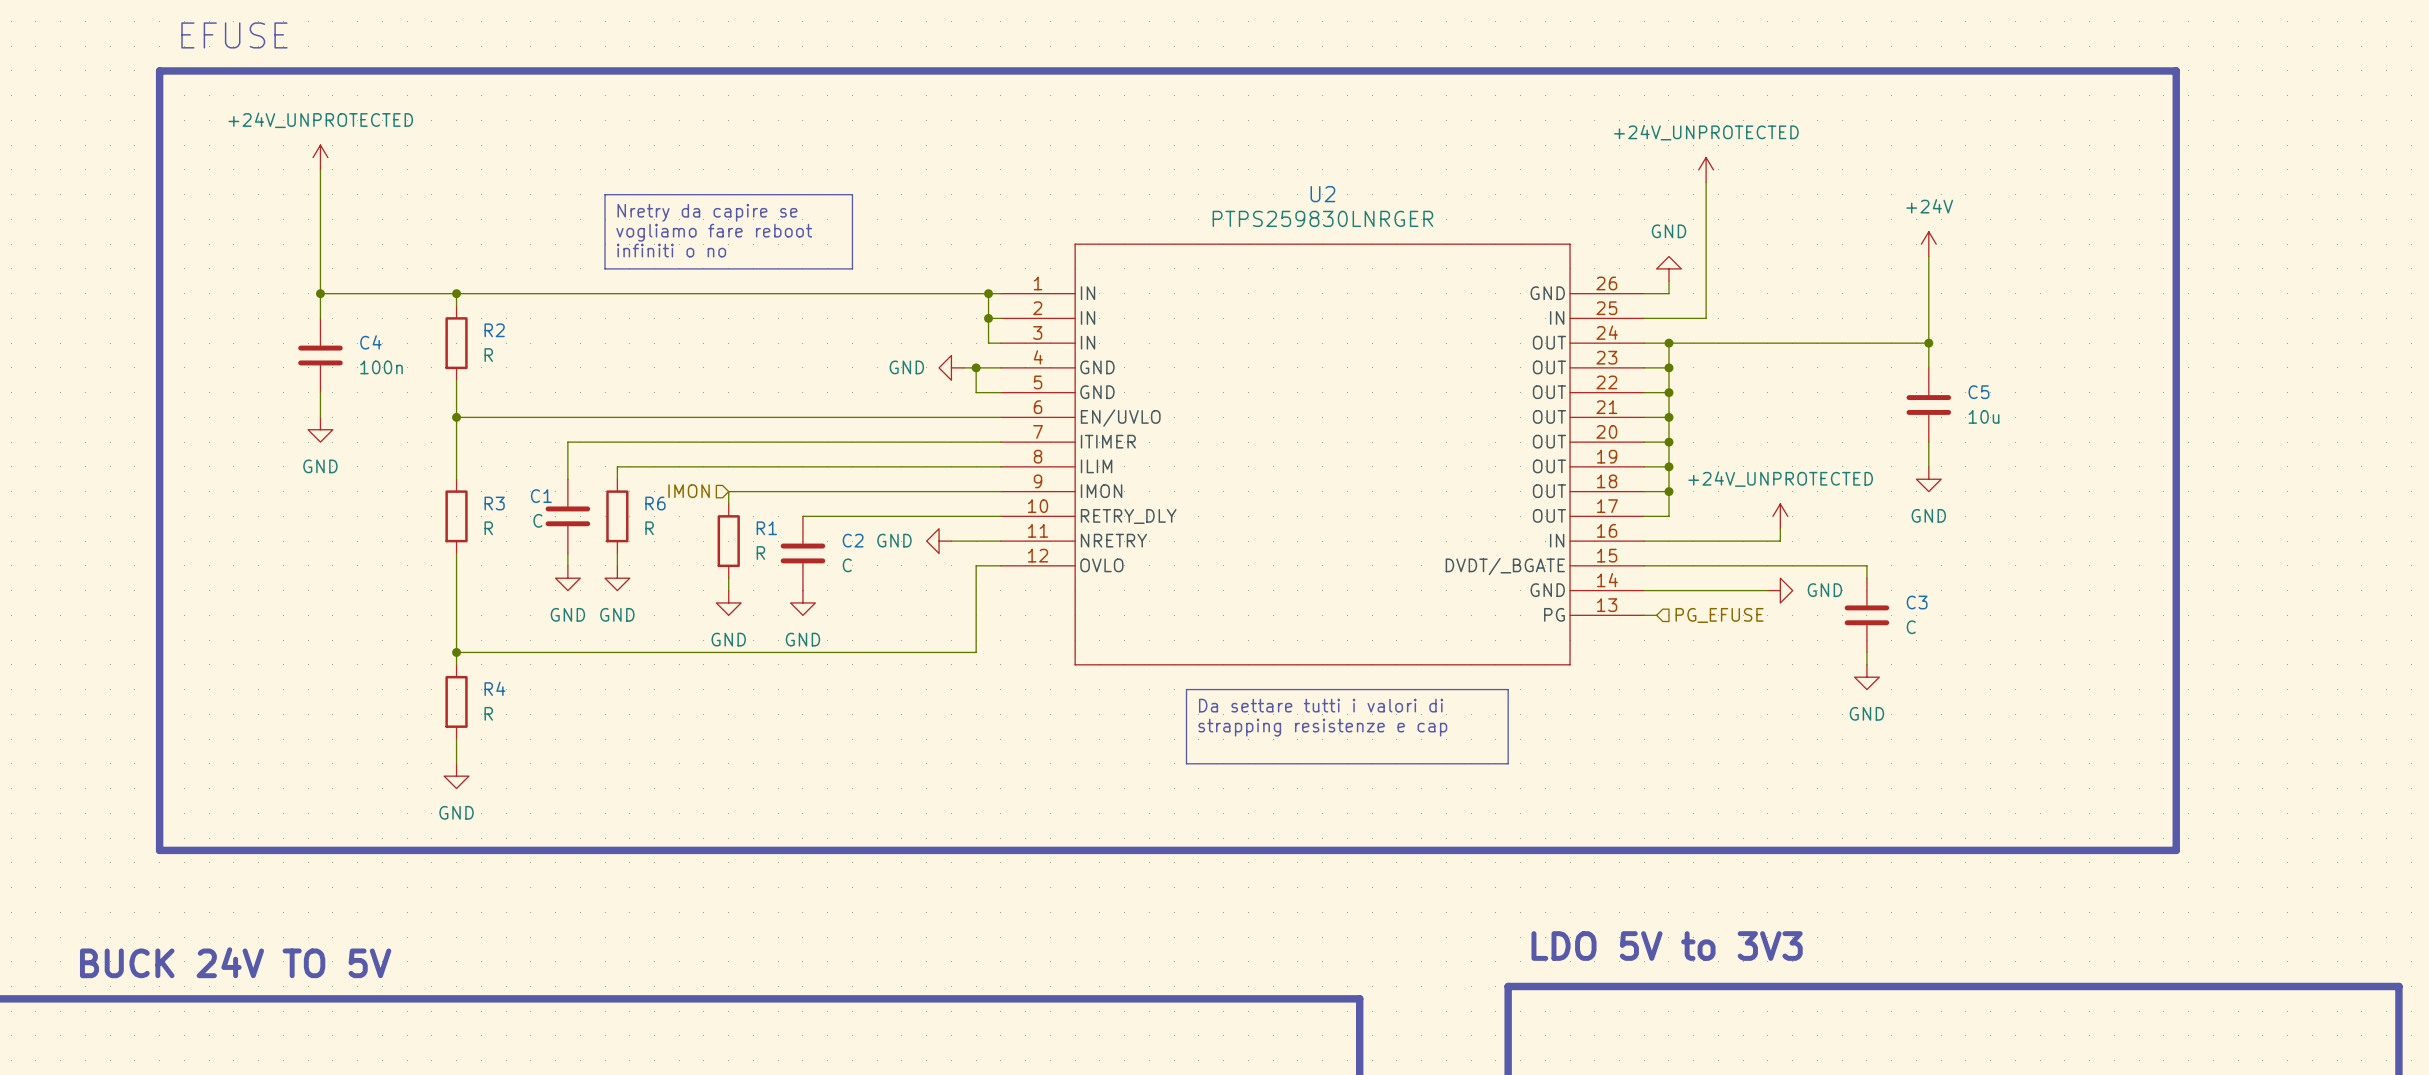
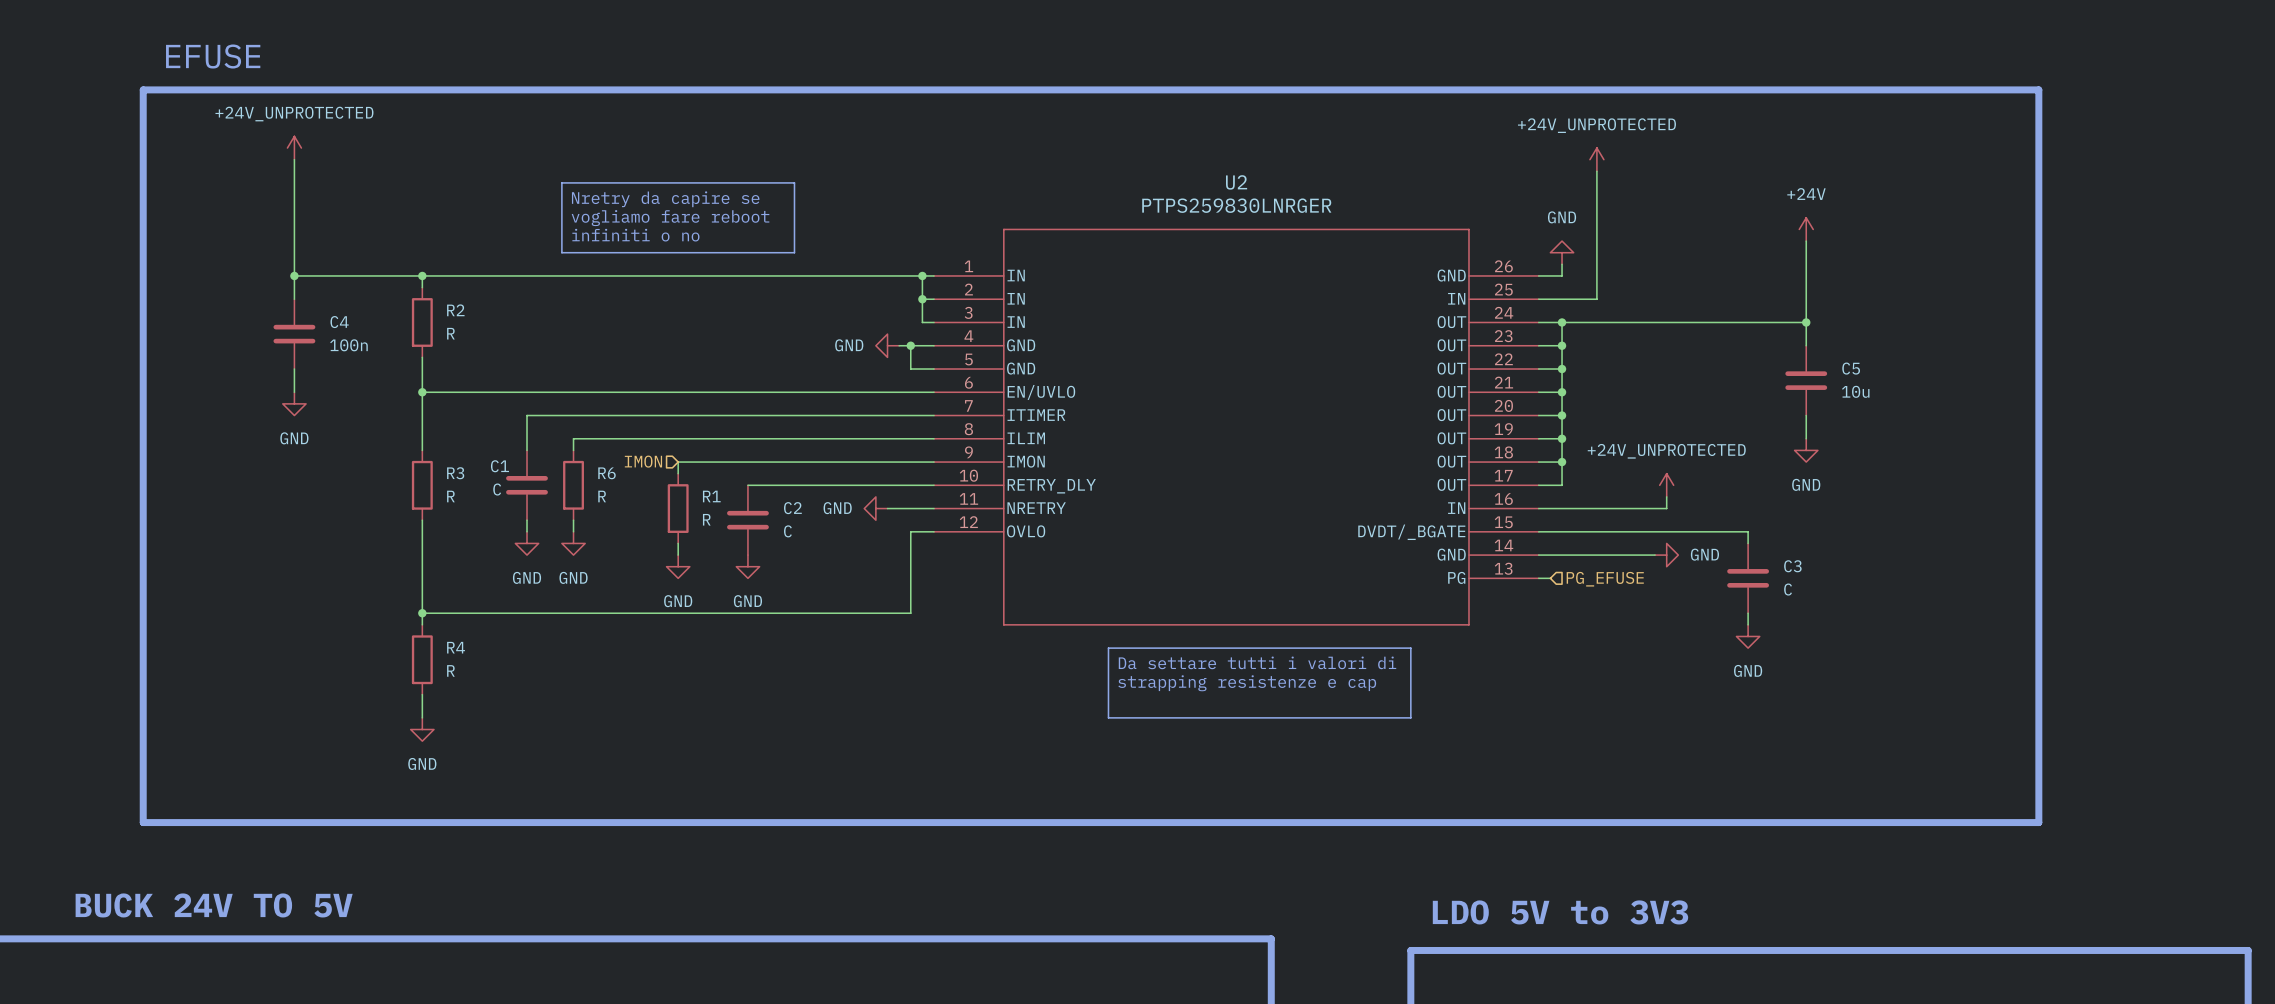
text position: EFUSE (234, 35) -> EFUSE (213, 56)
line: (159, 95) (159, 70) (2176, 70) (2176, 95) -> (143, 89) (2038, 89)
line: (159, 850) (2176, 850) -> (143, 799) (143, 822) (2038, 822) (2038, 799)
text position: LDO 5V to 3V3 (1667, 946) -> LDO 5V to 3V3 (1560, 912)
line: (1508, 1011) (1508, 986) (2398, 986) (2398, 1011) -> (1410, 950) (2248, 950)

